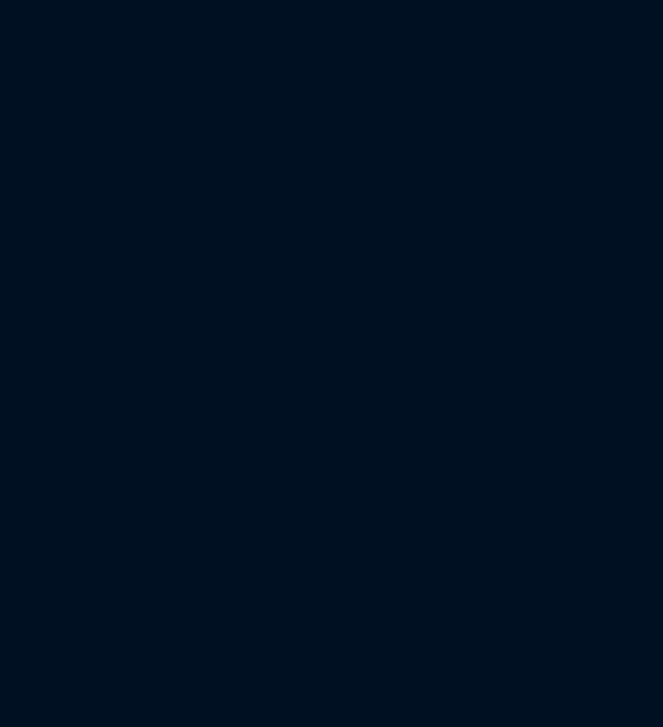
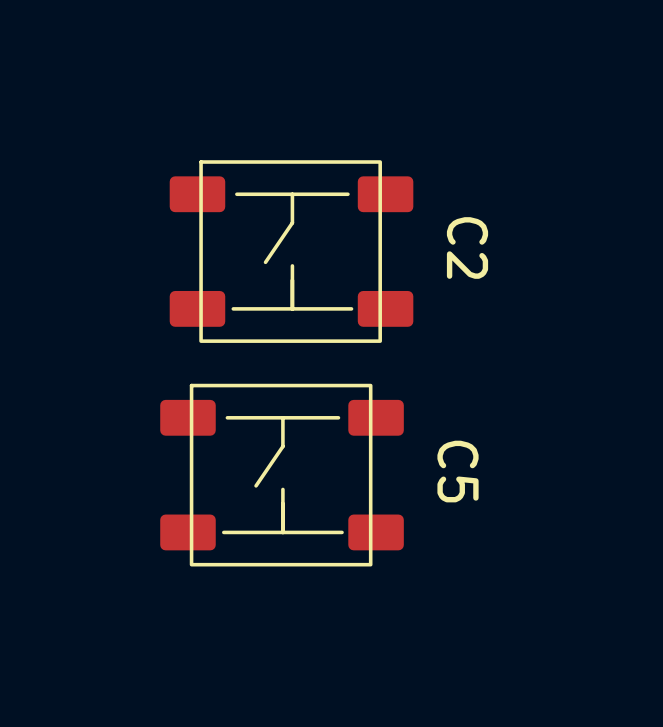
part: none -> C2 (291, 251)
part: none -> C5 (282, 475)

